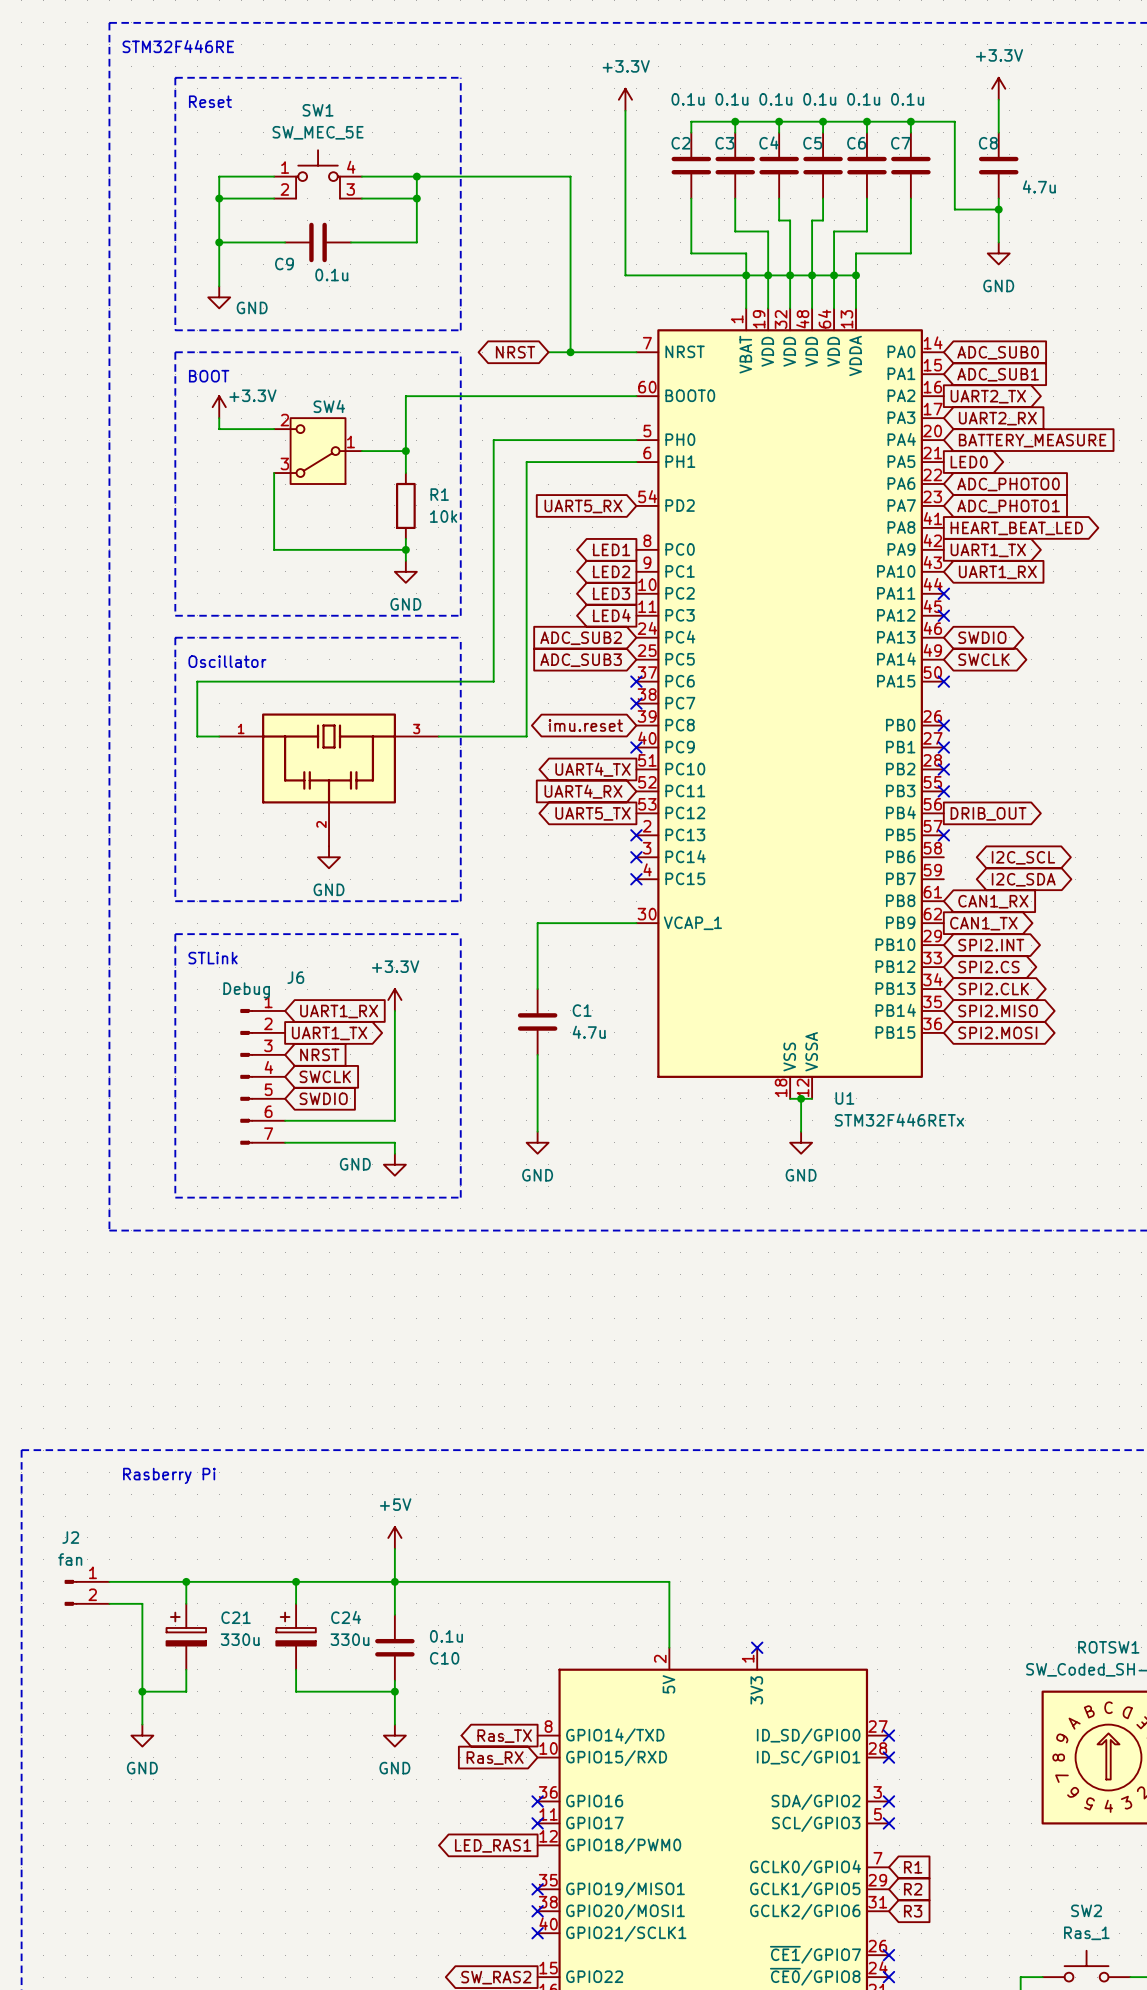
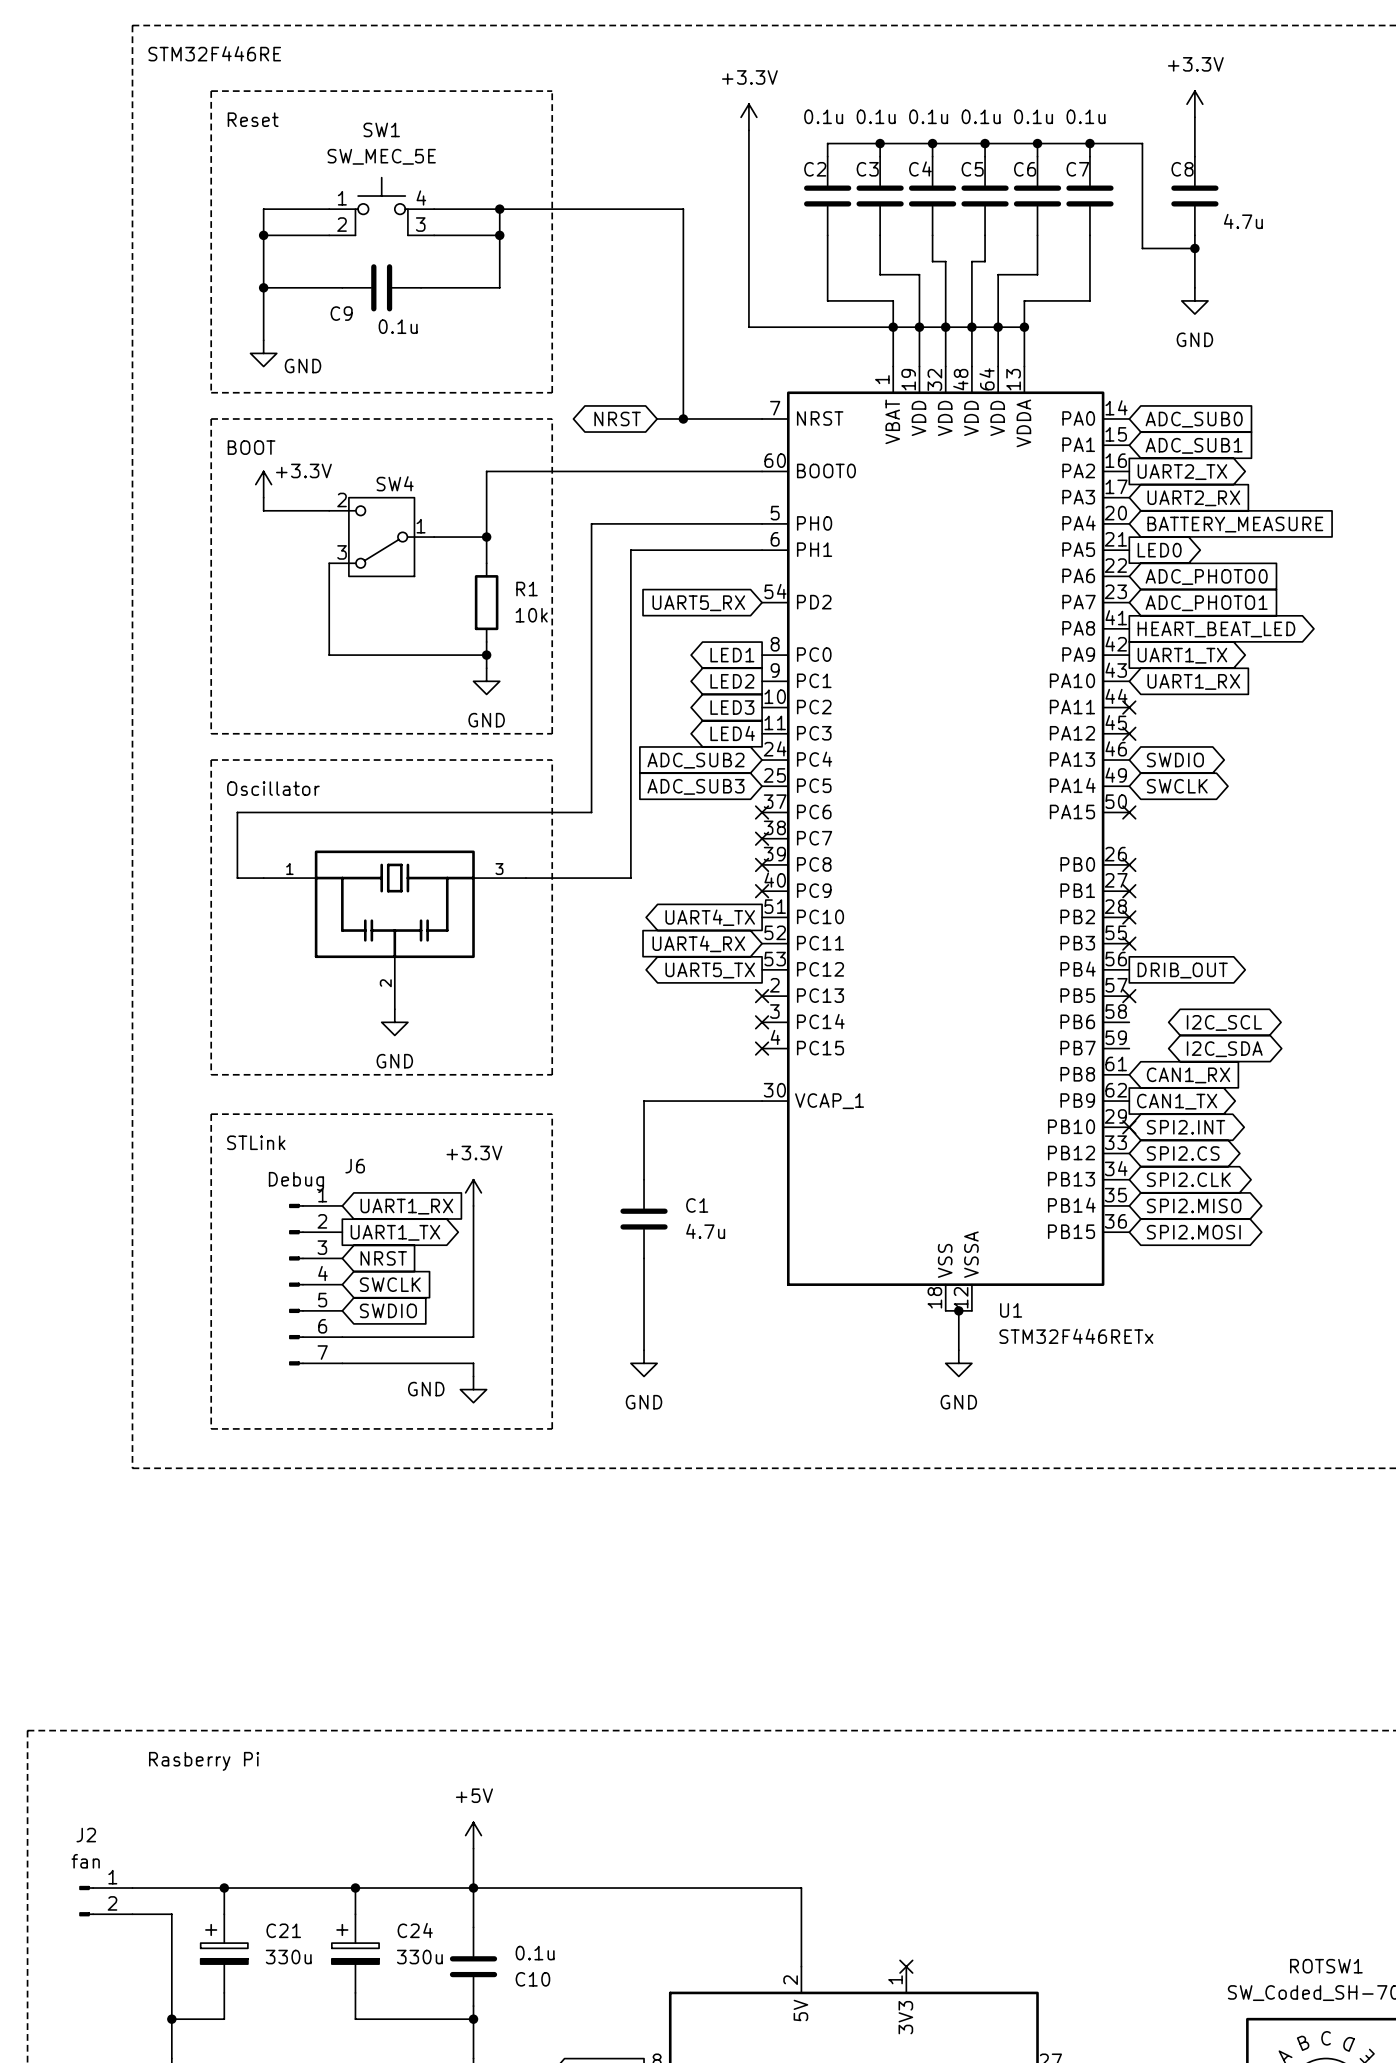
global label: imu.reset (585, 725) -> none
no-connect mark: none -> (762, 864)
no-connect mark: none -> (1129, 1127)

